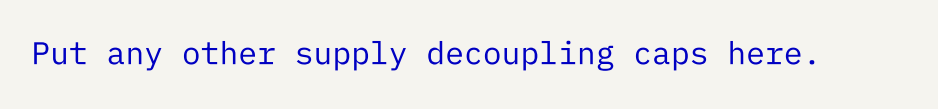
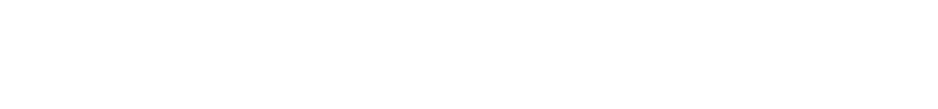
text: Put any other supply decoupling caps here. (424, 55) -> none

